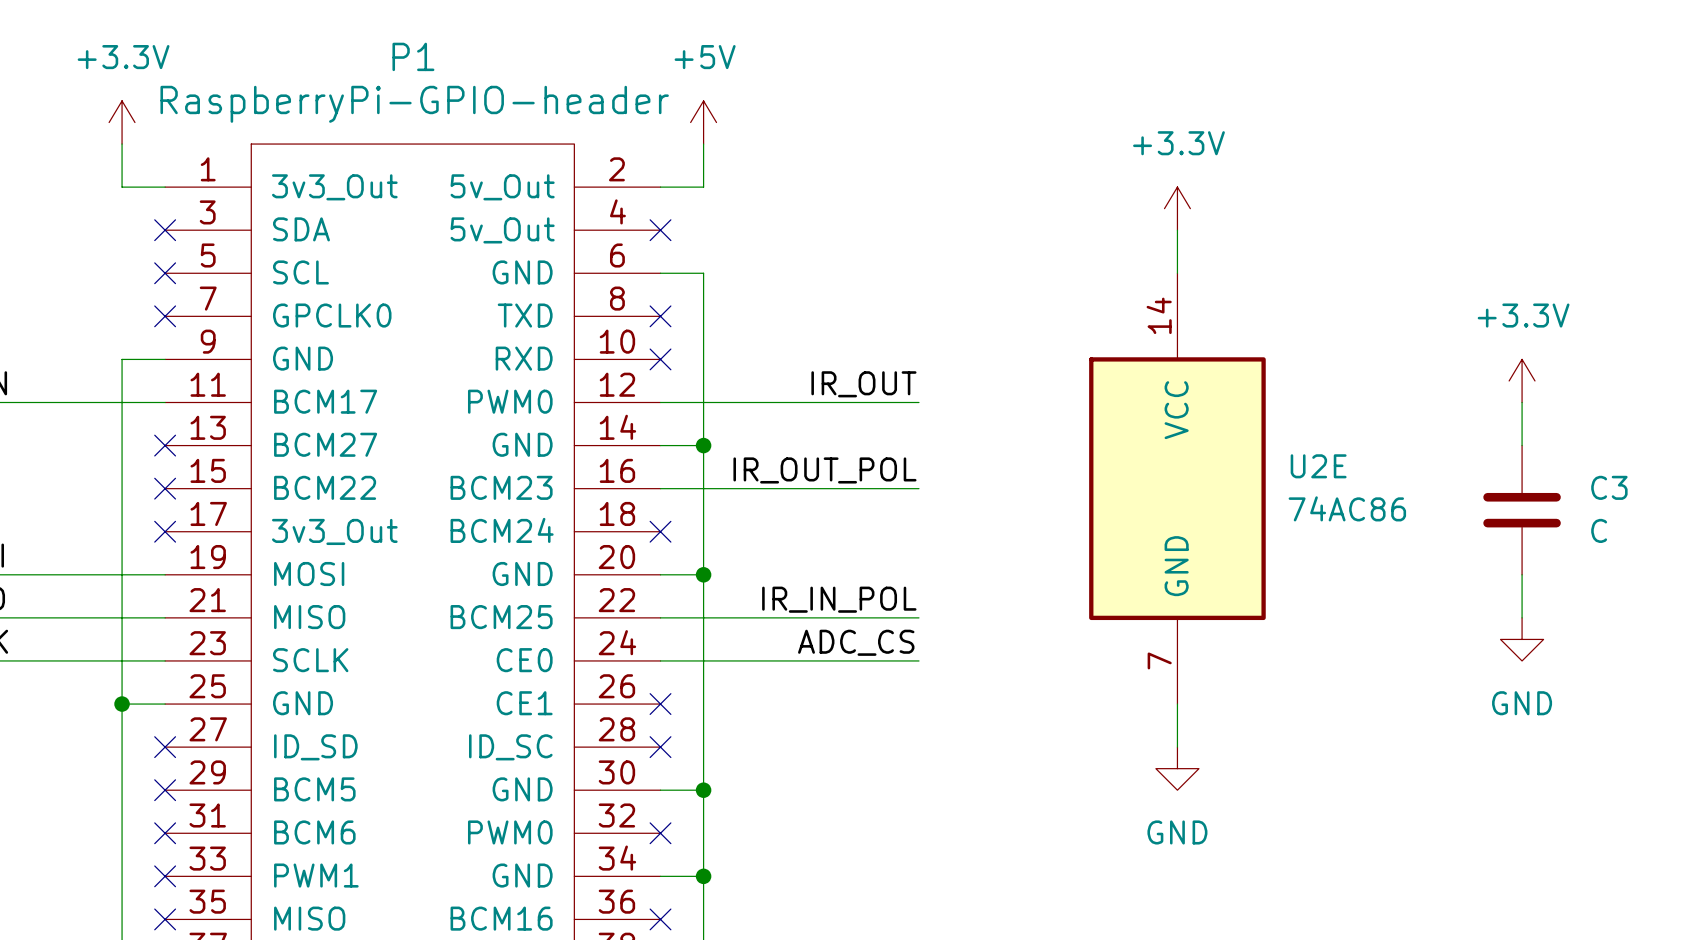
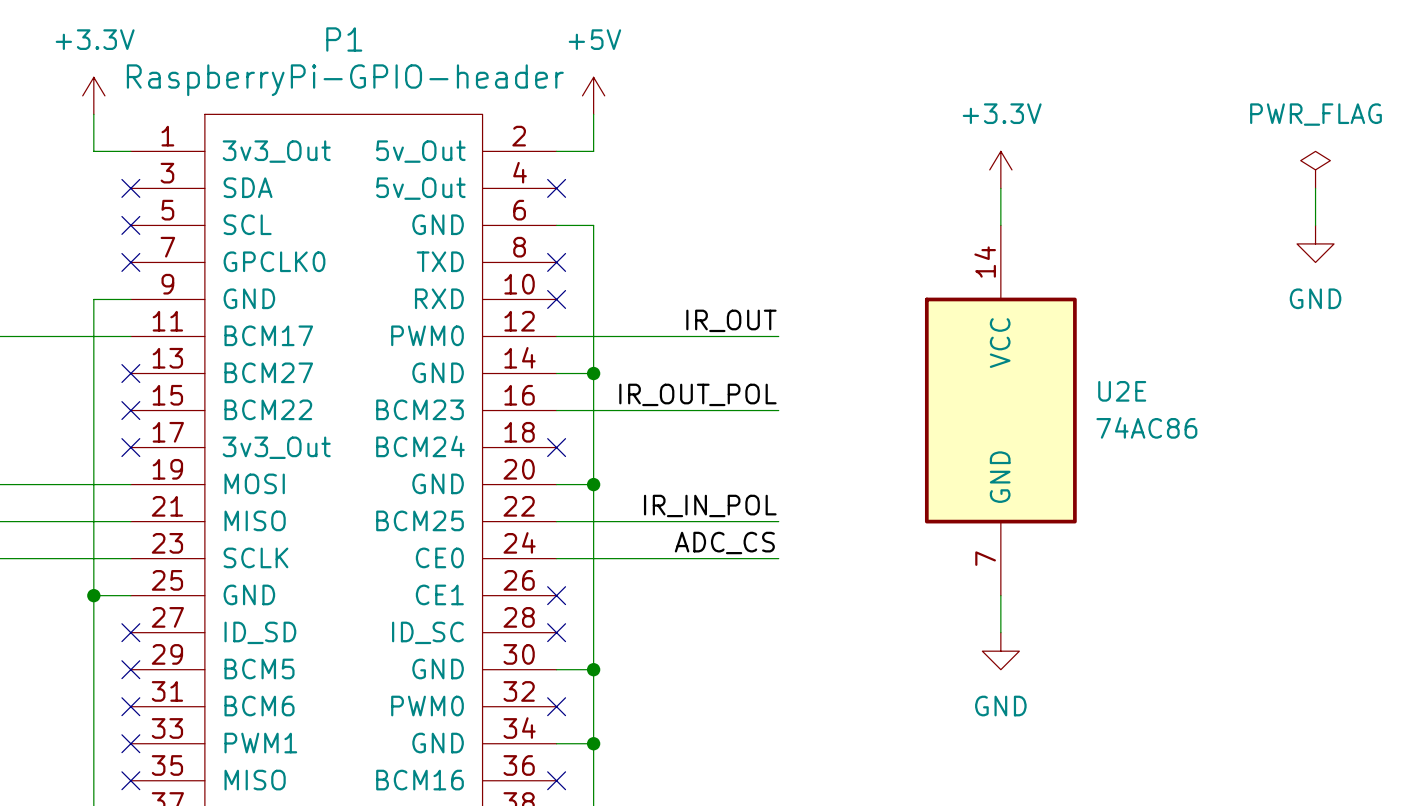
power symbol: none -> PWR_FLAG (1315, 169)
power symbol: +3.3V (1522, 380) -> none
wire: (1522, 402) (1522, 445) -> (1315, 188) (1315, 225)
C3: C (1522, 510) -> none
wire: (1522, 574) (1522, 617) -> none
power symbol position: GND (1522, 639) -> GND (1315, 243)

